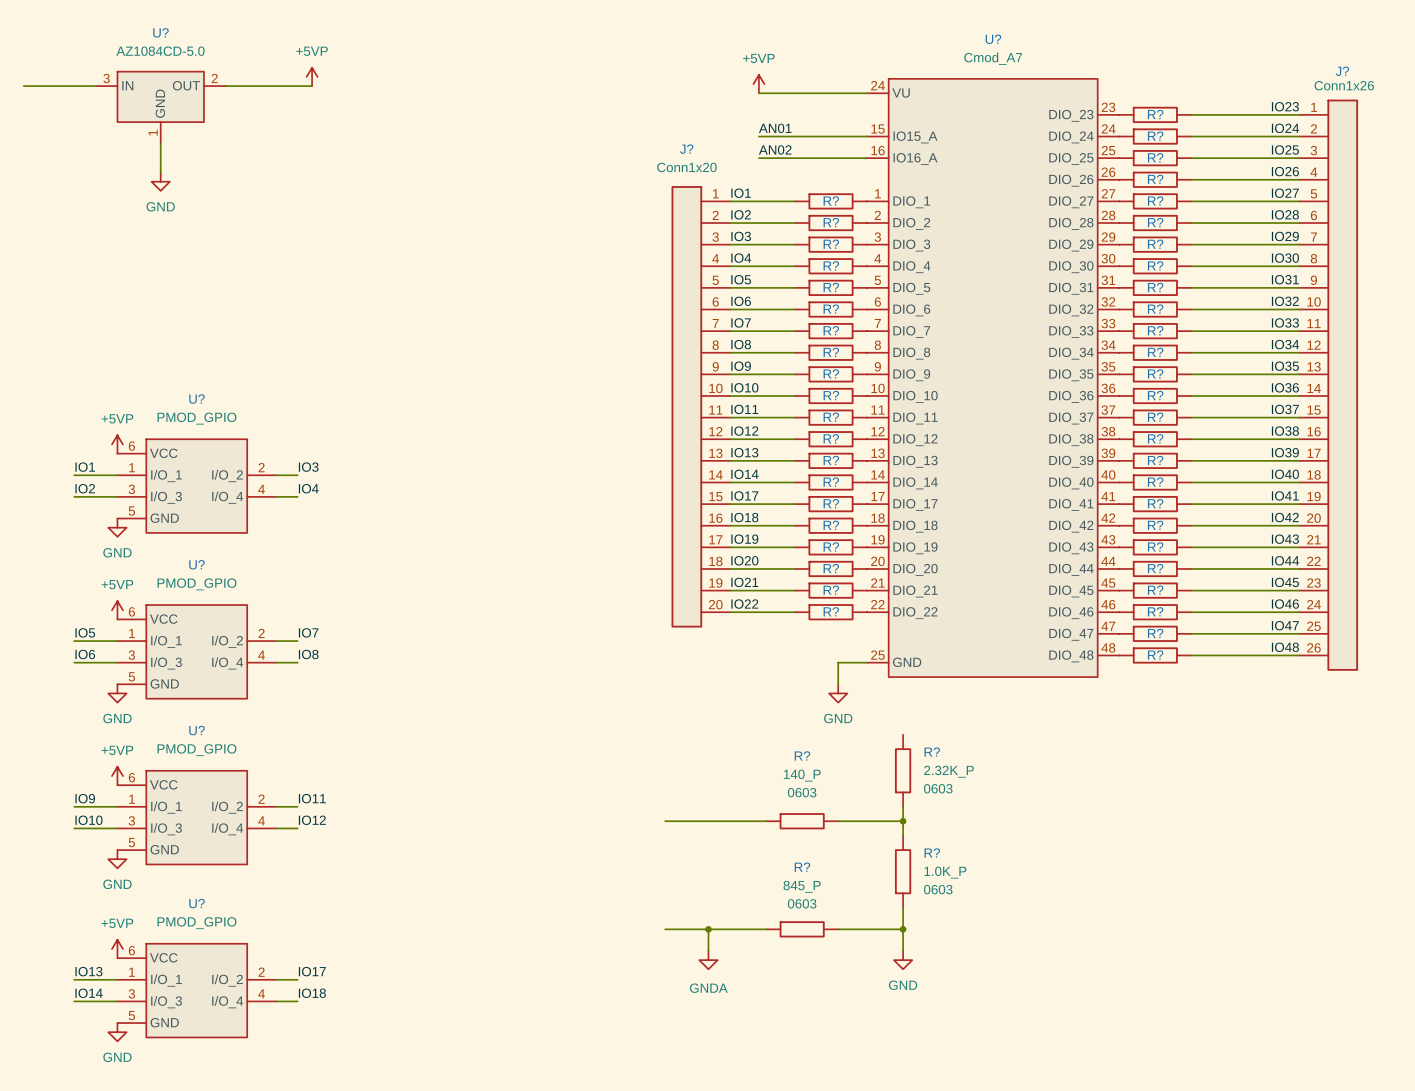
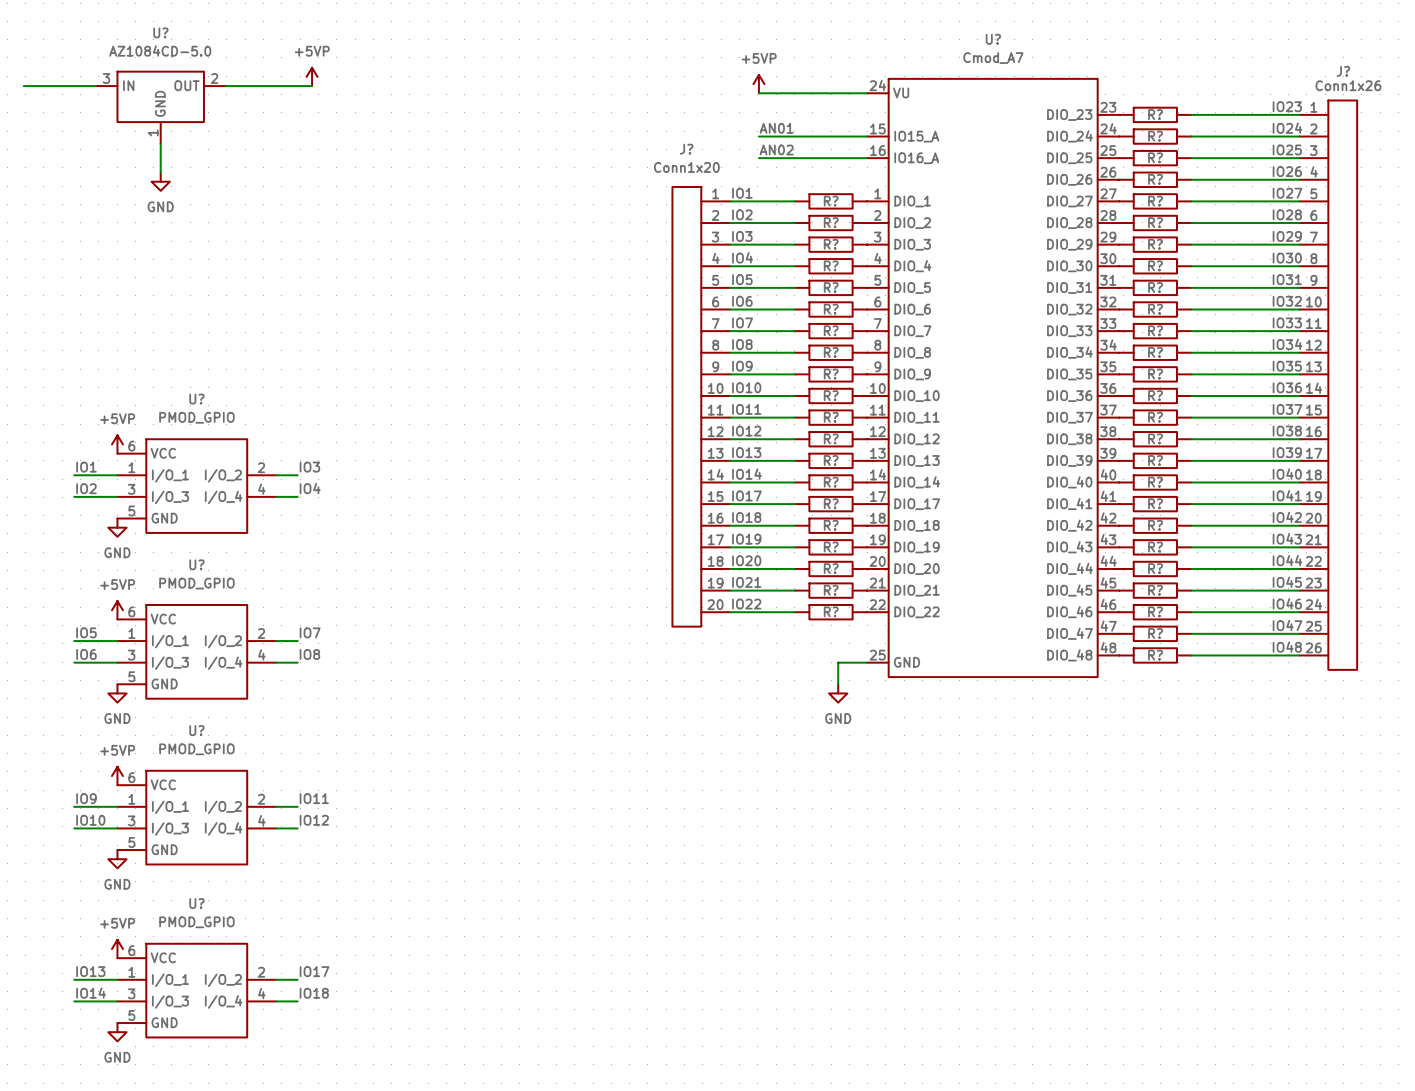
R?: 2.32K_P (903, 770) -> none
wire: (903, 806) (903, 835) -> none
wire: (665, 821) (766, 821) -> none
R?: 140_P (802, 821) -> none
wire: (838, 821) (903, 821) -> none
junction: (903, 821) -> none
R?: 1.0K_P (903, 871) -> none
wire: (903, 907) (903, 950) -> none
wire: (665, 929) (766, 929) -> none
wire: (708, 929) (708, 950) -> none
junction: (708, 929) -> none
R?: 845_P (802, 929) -> none
wire: (838, 929) (903, 929) -> none
junction: (903, 929) -> none
power symbol: GNDA (708, 960) -> none
power symbol: GND (903, 960) -> none

